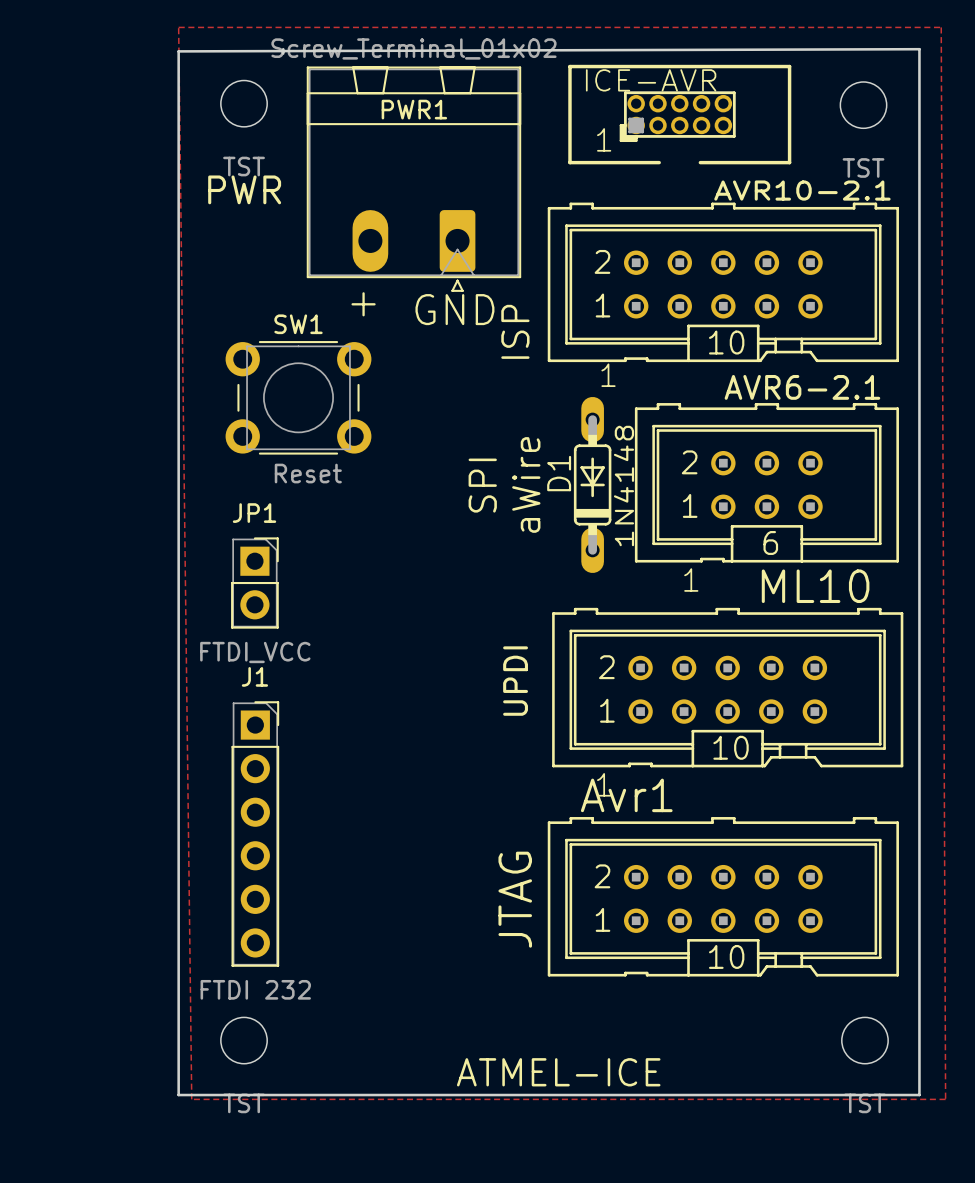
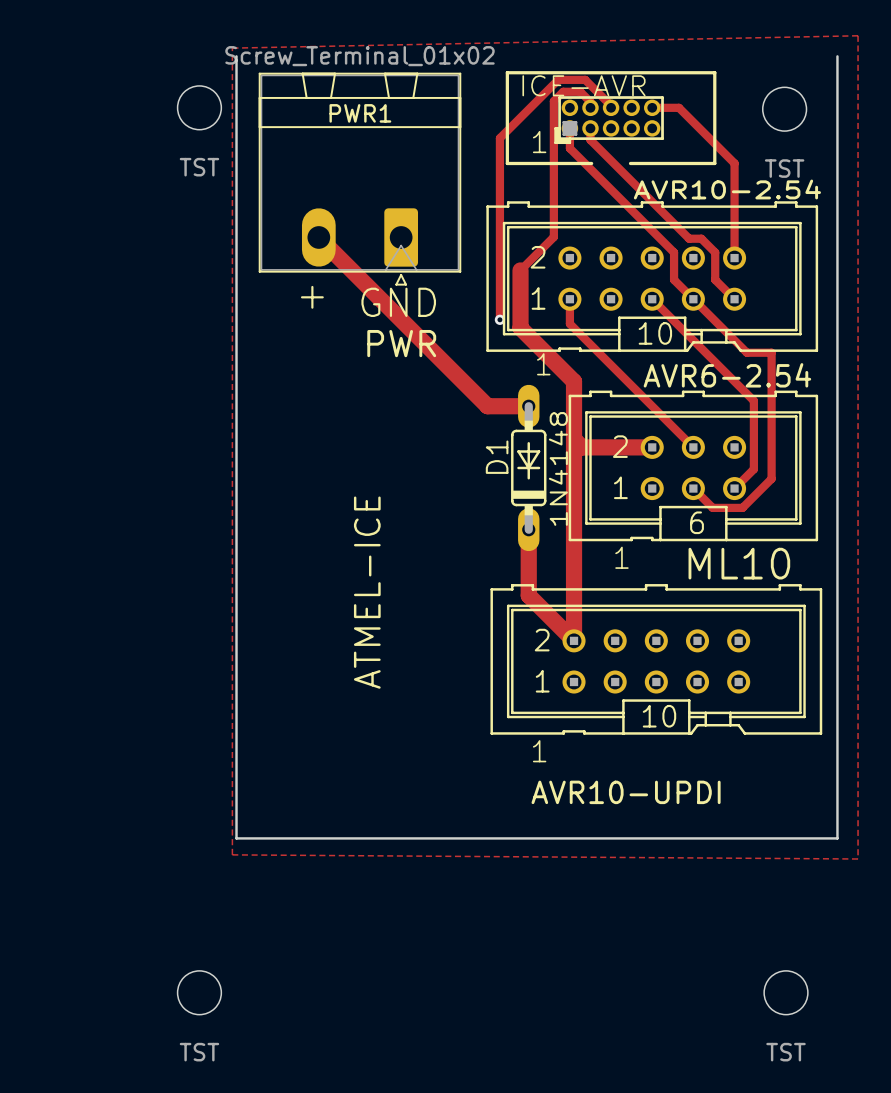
zone outline: (178, 27) (941, 27) (945, 1099) (191, 1099) (178, 27) -> (858, 35) (232, 48) (232, 854) (858, 859) (858, 35)
board edge: (919, 49) (178, 51) (178, 1095) (919, 1095) (919, 877) -> (236, 60) (236, 838) (837, 838)
track: none -> (590, 107) (590, 102) (580, 91) (563, 91) (553, 101) (553, 237) (520, 270) (520, 328) (574, 381) (574, 640) (528, 595) (528, 529)
track: none -> (611, 107) (585, 79) (558, 79) (499, 138) (499, 319)
track: none -> (652, 107) (678, 107) (734, 163) (734, 258)
track: none -> (569, 128) (569, 148) (674, 252) (674, 279) (746, 352) (771, 352) (771, 478) (742, 507) (712, 507) (693, 488)
track: none -> (590, 128) (590, 140) (689, 238) (701, 238) (715, 252) (715, 279) (734, 299)
text position: PWR (244, 189) -> PWR (401, 343)
AVR10-2.1 name: AVR10-2.1 (802, 190) -> AVR10-2.54 (727, 189)
track: none -> (318, 237) (487, 406) (528, 406)
track: none -> (569, 299) (569, 323) (693, 447)
track: none -> (652, 299) (753, 400) (753, 469) (734, 488)
via: none -> (499, 319)
text: ISP (515, 331) -> none
AVR6-2.1 name: AVR6-2.1 (802, 387) -> AVR6-2.54 (727, 375)
SW1: Reset (298, 397) -> none
track: none -> (574, 439) (582, 447) (652, 447)
text: aWire (526, 484) -> none
text: SPI (482, 485) -> none
JP1: FTDI_VCC (254, 583) -> none
text: none -> ATMEL-ICE (367, 592)
UPDI name: UPDI (515, 681) -> AVR10-UPDI (626, 792)
J1: FTDI 232 (255, 834) -> none
Avr1: JTAG (723, 896) -> none
text: ATMEL-ICE (558, 1072) -> none

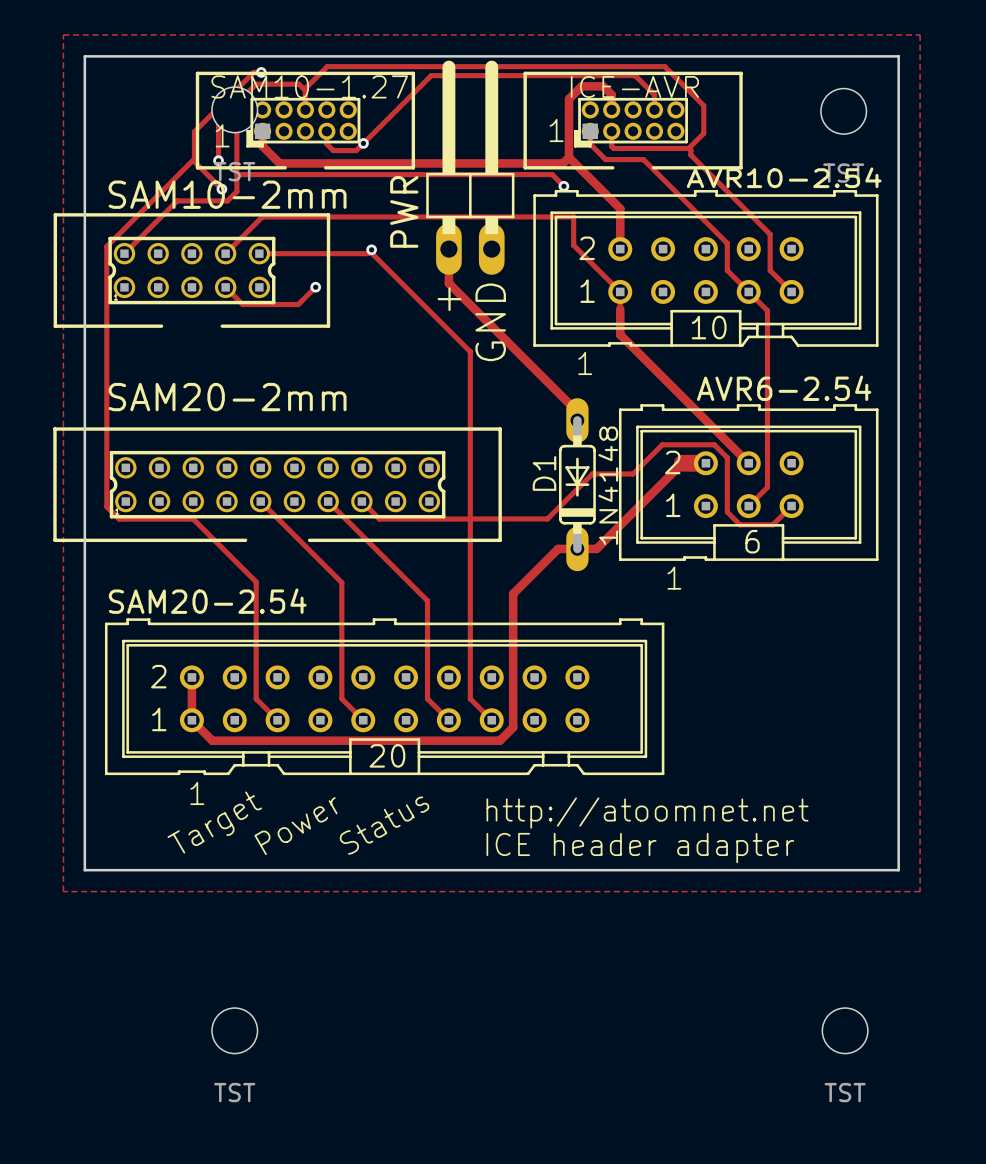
zone outline: (858, 35) (232, 48) (232, 854) (858, 859) -> (920, 34) (63, 34) (63, 891) (920, 891)
board edge: (236, 56) (236, 838) -> (898, 56) (84, 56) (84, 870) (273, 870)
track: none -> (261, 72) (253, 72) (194, 131) (194, 161) (221, 189)
via: none -> (261, 72)
text: none -> SAM10-1.27 (309, 86)
track: none -> (305, 90) (299, 84) (256, 84) (218, 121) (218, 160)
track: none -> (262, 109) (249, 109) (236, 122) (236, 191) (227, 200) (177, 200) (124, 253)
track: none -> (305, 109) (305, 88) (327, 66) (664, 66) (703, 105) (703, 133) (688, 148)
track: none -> (611, 109) (611, 94) (603, 86) (581, 86) (569, 99) (569, 157)
track: (590, 107) (590, 102) (580, 91) (563, 91) (553, 101) (553, 237) (520, 270) (520, 328) (574, 381) (574, 640) (528, 595) (528, 529) -> none
track: none -> (654, 109) (654, 94) (635, 75) (431, 75) (356, 150) (333, 150) (326, 144) (326, 131)
track: (611, 107) (585, 79) (558, 79) (499, 138) (499, 319) -> none
track: (652, 107) (678, 107) (734, 163) (734, 258) -> none
part: none -> (305, 120)
part position: (611, 118) -> (633, 120)
track: none -> (262, 131) (262, 146) (279, 163) (563, 163) (569, 157)
track: none -> (611, 131) (611, 146) (613, 148) (688, 148)
track: (569, 128) (569, 148) (674, 252) (674, 279) (746, 352) (771, 352) (771, 478) (742, 507) (712, 507) (693, 488) -> (590, 131) (590, 144) (605, 159) (643, 159) (727, 243) (727, 270) (767, 310) (767, 487) (748, 506)
track: (590, 128) (590, 140) (689, 238) (701, 238) (715, 252) (715, 279) (734, 299) -> none
text: none -> 1 (222, 135)
via: none -> (363, 143)
text position: 1 (539, 142) -> 1 (556, 130)
track: none -> (688, 148) (690, 155) (770, 234) (770, 270) (791, 291)
track: none -> (569, 157) (620, 208) (620, 249)
track: none -> (194, 158) (106, 246) (106, 506) (119, 519) (193, 519) (256, 582) (256, 698) (277, 720)
via: none -> (218, 160)
part: none -> (470, 167)
track: none -> (236, 174) (552, 174) (563, 186)
PWR1: Screw_Terminal_01x02 (359, 179) -> none
via: none -> (563, 186)
via: none -> (221, 189)
text: none -> SAM10-2mm (227, 194)
track: (318, 237) (487, 406) (528, 406) -> (448, 249) (448, 283) (577, 411) (577, 420)
track: none -> (371, 249) (367, 253) (259, 253)
via: none -> (371, 249)
track: none -> (369, 251) (470, 351) (470, 698) (491, 720)
track: none -> (225, 253) (262, 216) (573, 216) (573, 245) (620, 291) (620, 309)
part: none -> (191, 270)
AVR10-2.54 position: (652, 276) -> (705, 268)
track: none -> (315, 287) (298, 304) (242, 304) (225, 287)
via: none -> (315, 287)
text position: + (312, 297) -> + (449, 299)
track: (652, 299) (753, 400) (753, 469) (734, 488) -> (470, 518) (547, 518) (592, 473) (633, 473) (662, 444) (714, 444) (727, 457) (727, 512) (740, 524) (772, 524) (791, 506)
text rotation: 0° (398, 302) -> 90° counterclockwise (490, 322)
via: (499, 319) -> none
text rotation: 0° (401, 343) -> 90° counterclockwise (404, 211)
text position: PWR (401, 343) -> PWR (404, 211)
text position: 1 (543, 364) -> 1 (585, 363)
text: none -> SAM20-2mm (227, 397)
track: (574, 439) (582, 447) (629, 447) -> (191, 677) (191, 720) (212, 740) (499, 740) (513, 727) (513, 593) (558, 548) (596, 548) (682, 463)
part: none -> (277, 484)
track: none -> (260, 501) (341, 582) (341, 698) (363, 720)
track: none -> (328, 501) (427, 600) (427, 698) (448, 720)
track: none -> (361, 501) (379, 519) (470, 519)
text: ATMEL-ICE (367, 592) -> none
AVR10-UPDI: ML10 (656, 659) -> none
SAM20-2.54: none -> (384, 696)
text: 1 (539, 751) -> none
text: none -> 1 (197, 793)
text: none -> http://atoomnet.net (647, 813)
text: none -> Target (214, 822)
text: none -> Status (384, 825)
text: none -> Power (295, 826)
text: none -> ICE header adapter (640, 848)

